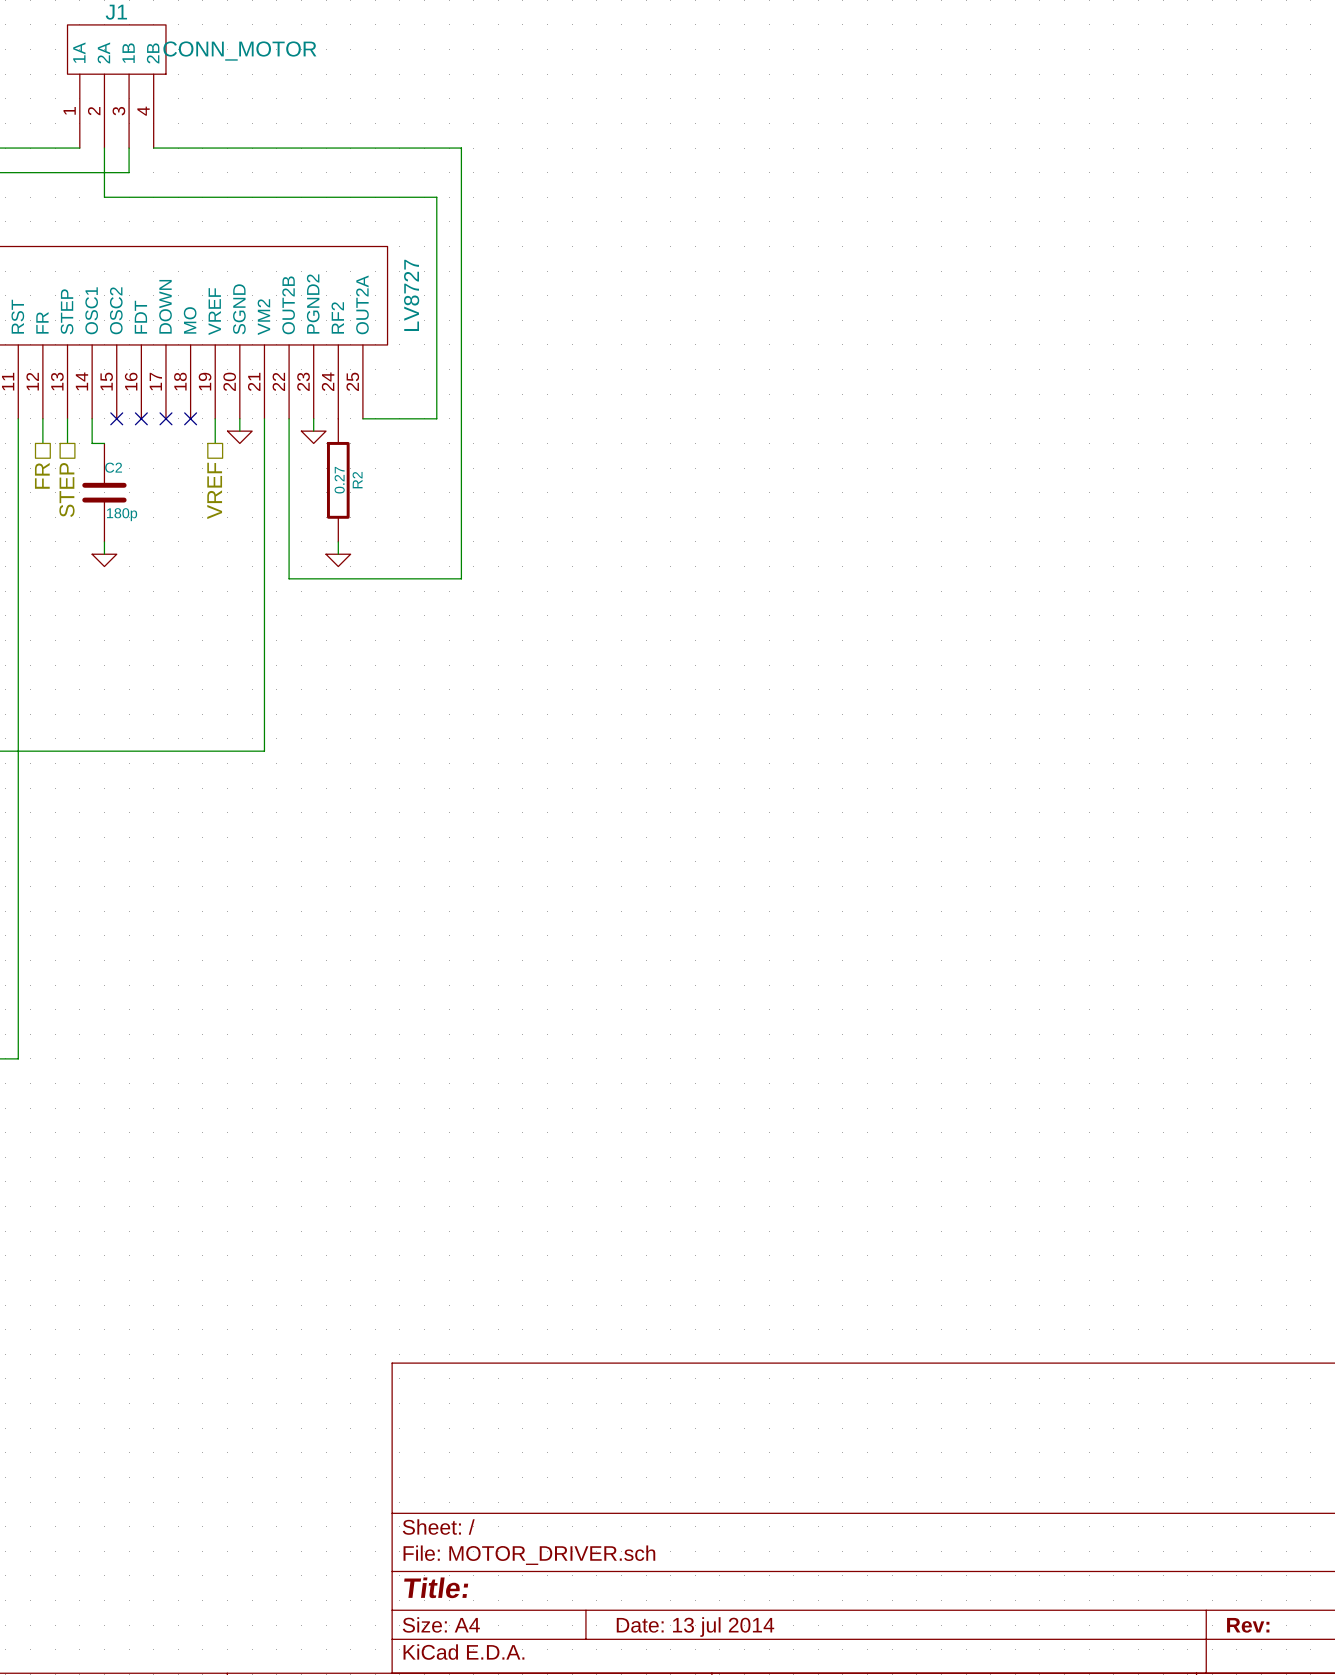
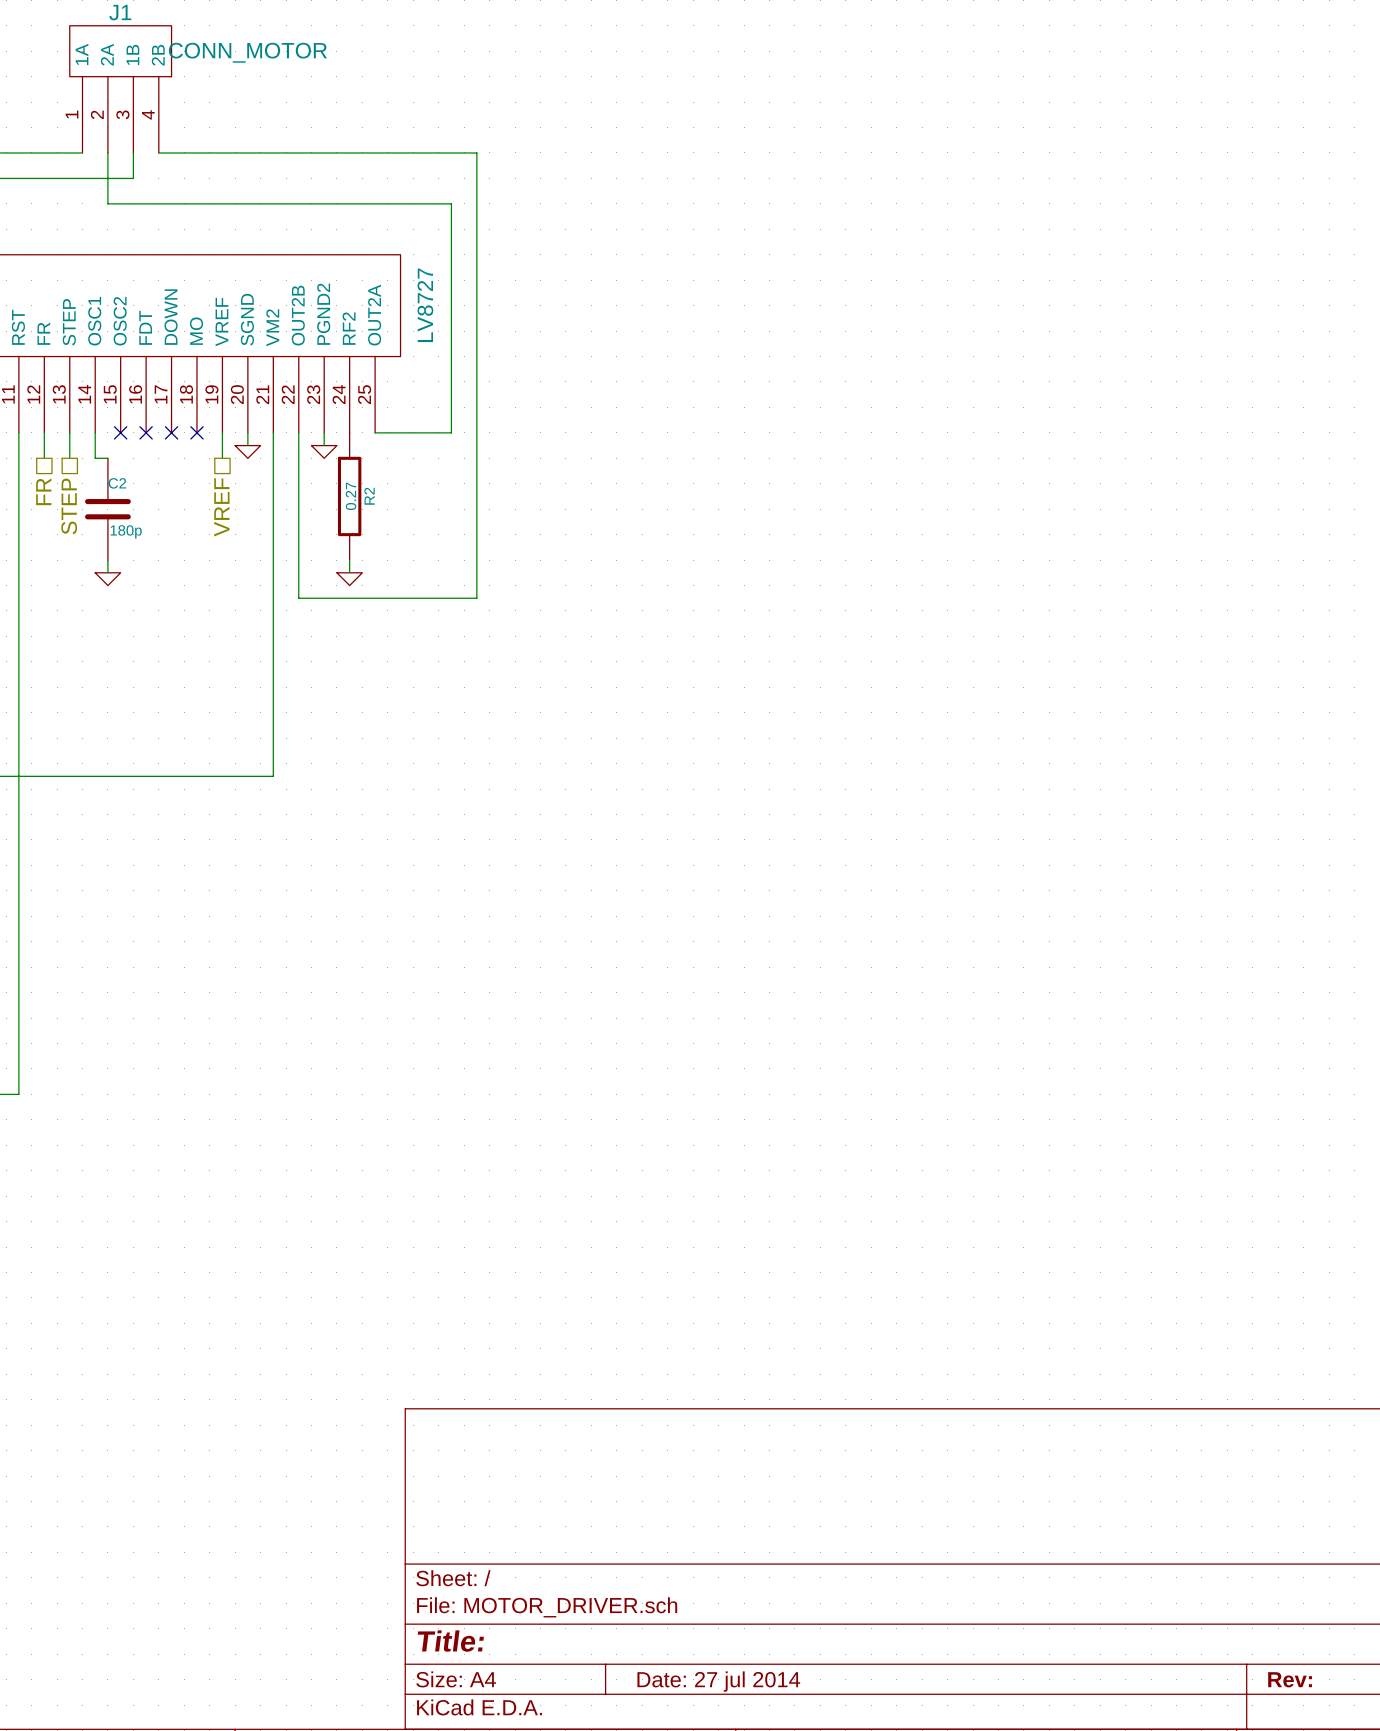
title block: Date: 13 jul 2014 (695, 1627) -> Date: 27 jul 2014 (718, 1681)

